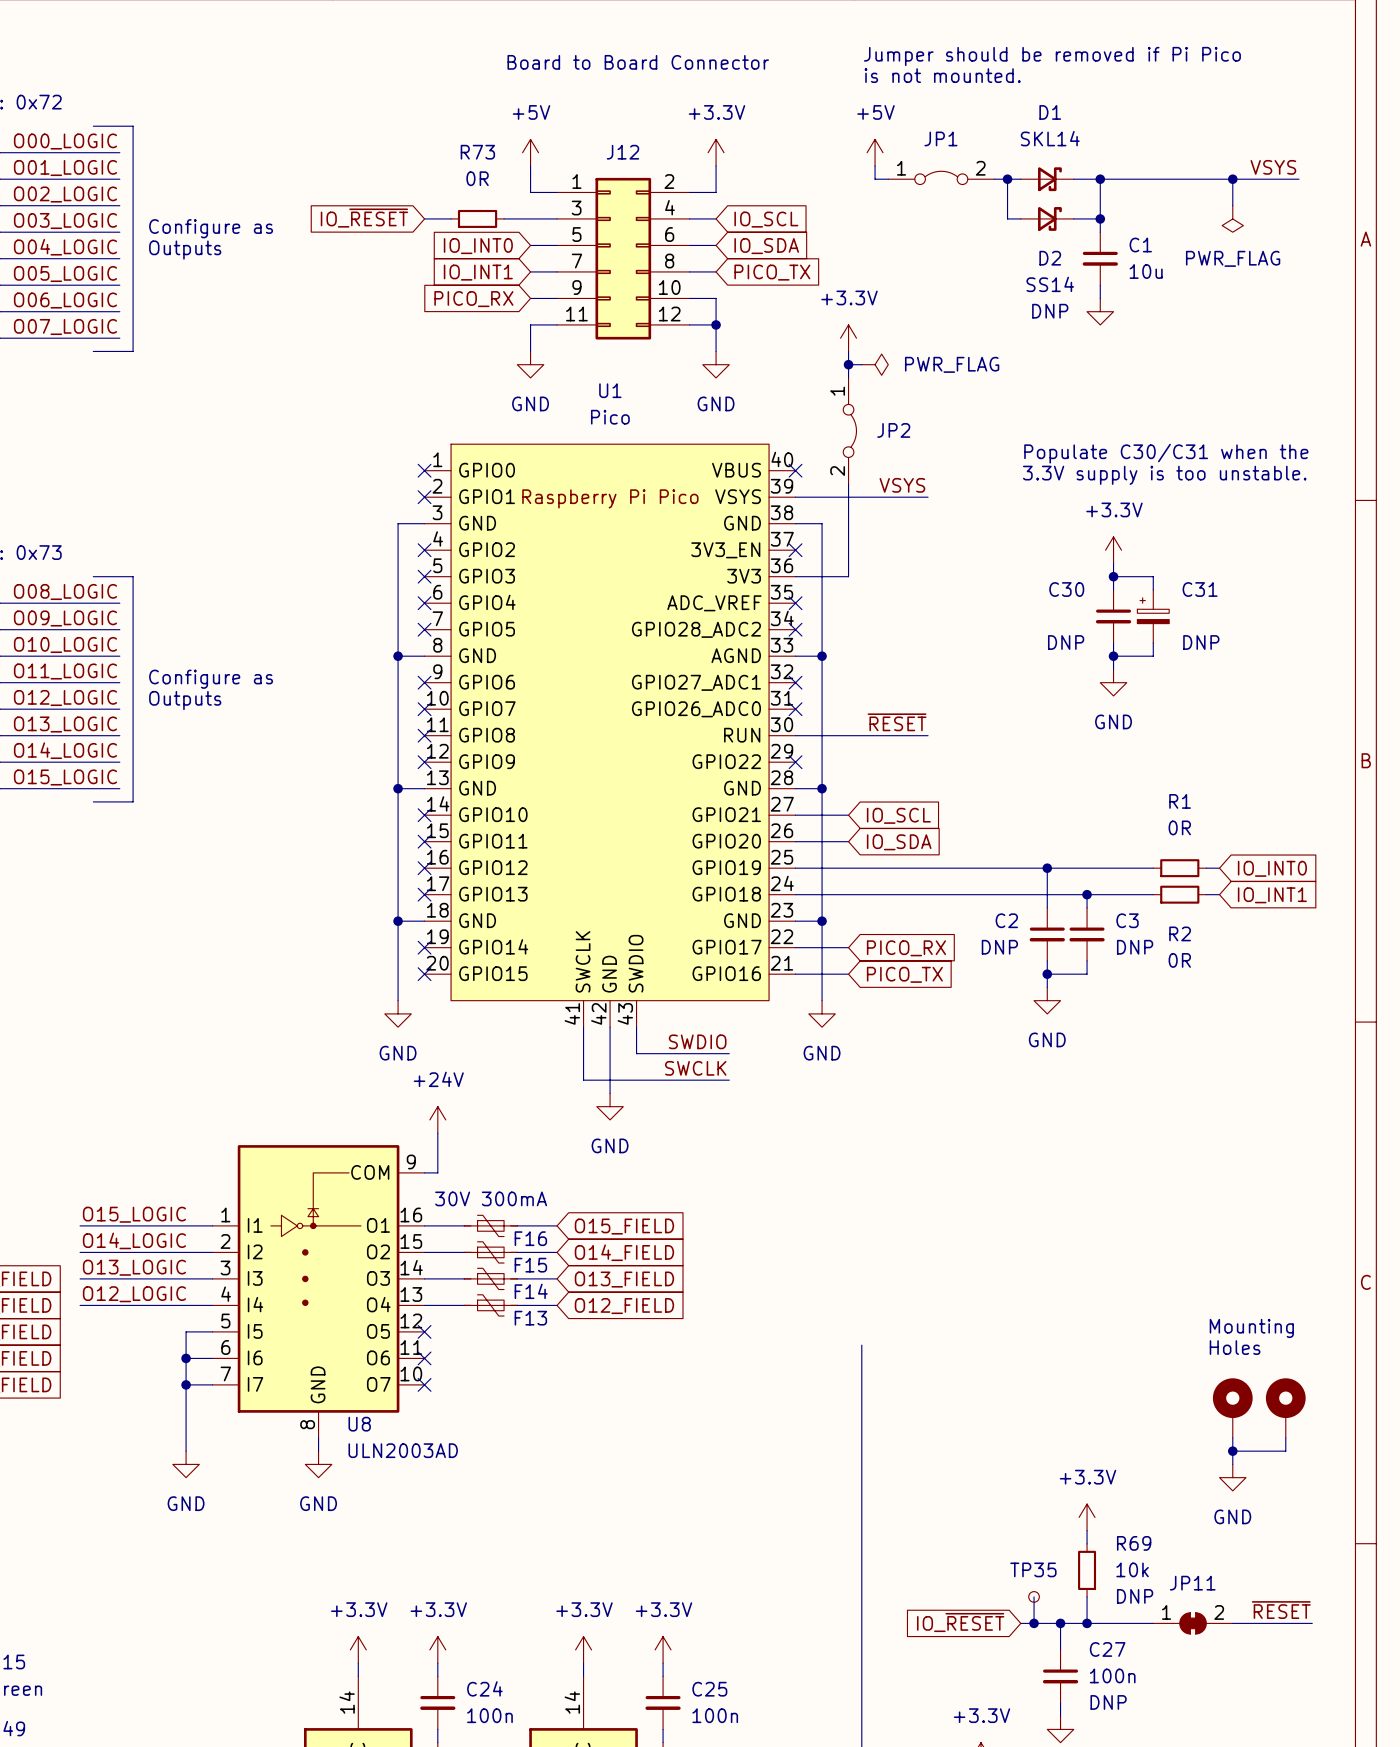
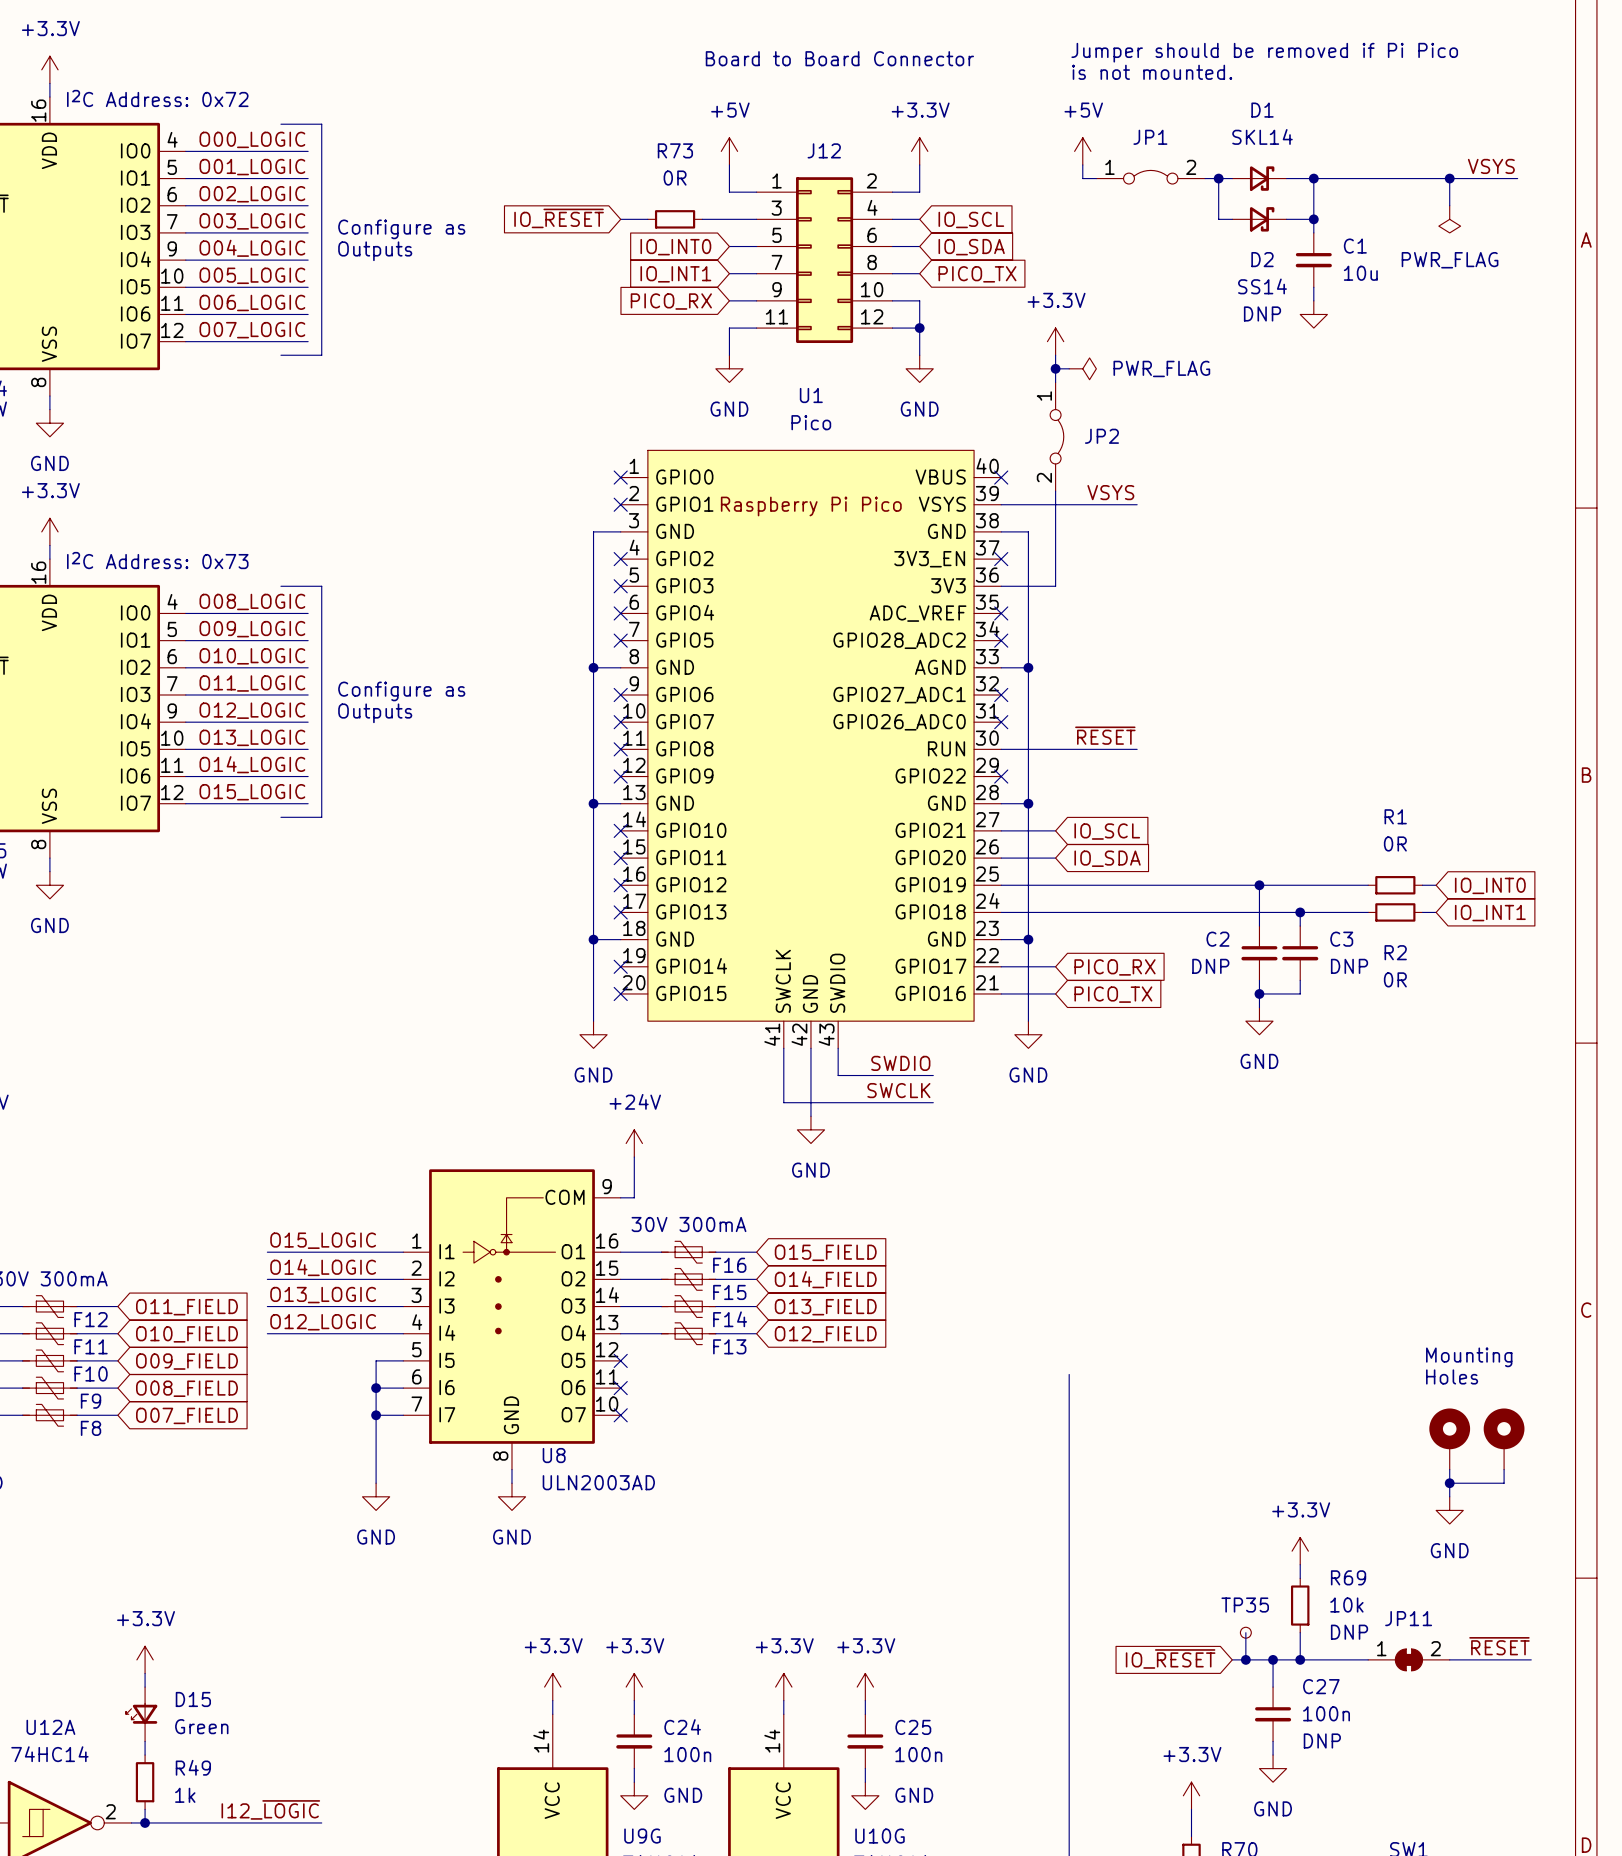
text: Populate C30/C31 when the (1166, 453) -> none
text: 3.3V supply is too unstable. (1164, 475) -> none
power symbol: +3.3V (1113, 550) -> none
wire: (1113, 563) (1113, 589) -> none
wire: (1113, 576) (1153, 576) (1153, 589) -> none
junction: (1113, 576) -> none
C30: (1113, 616) -> none
C31: (1153, 616) -> none
wire: (1113, 642) (1113, 669) -> none
wire: (1153, 642) (1153, 656) (1113, 656) -> none
junction: (1113, 656) -> none
power symbol: GND (1113, 682) -> none

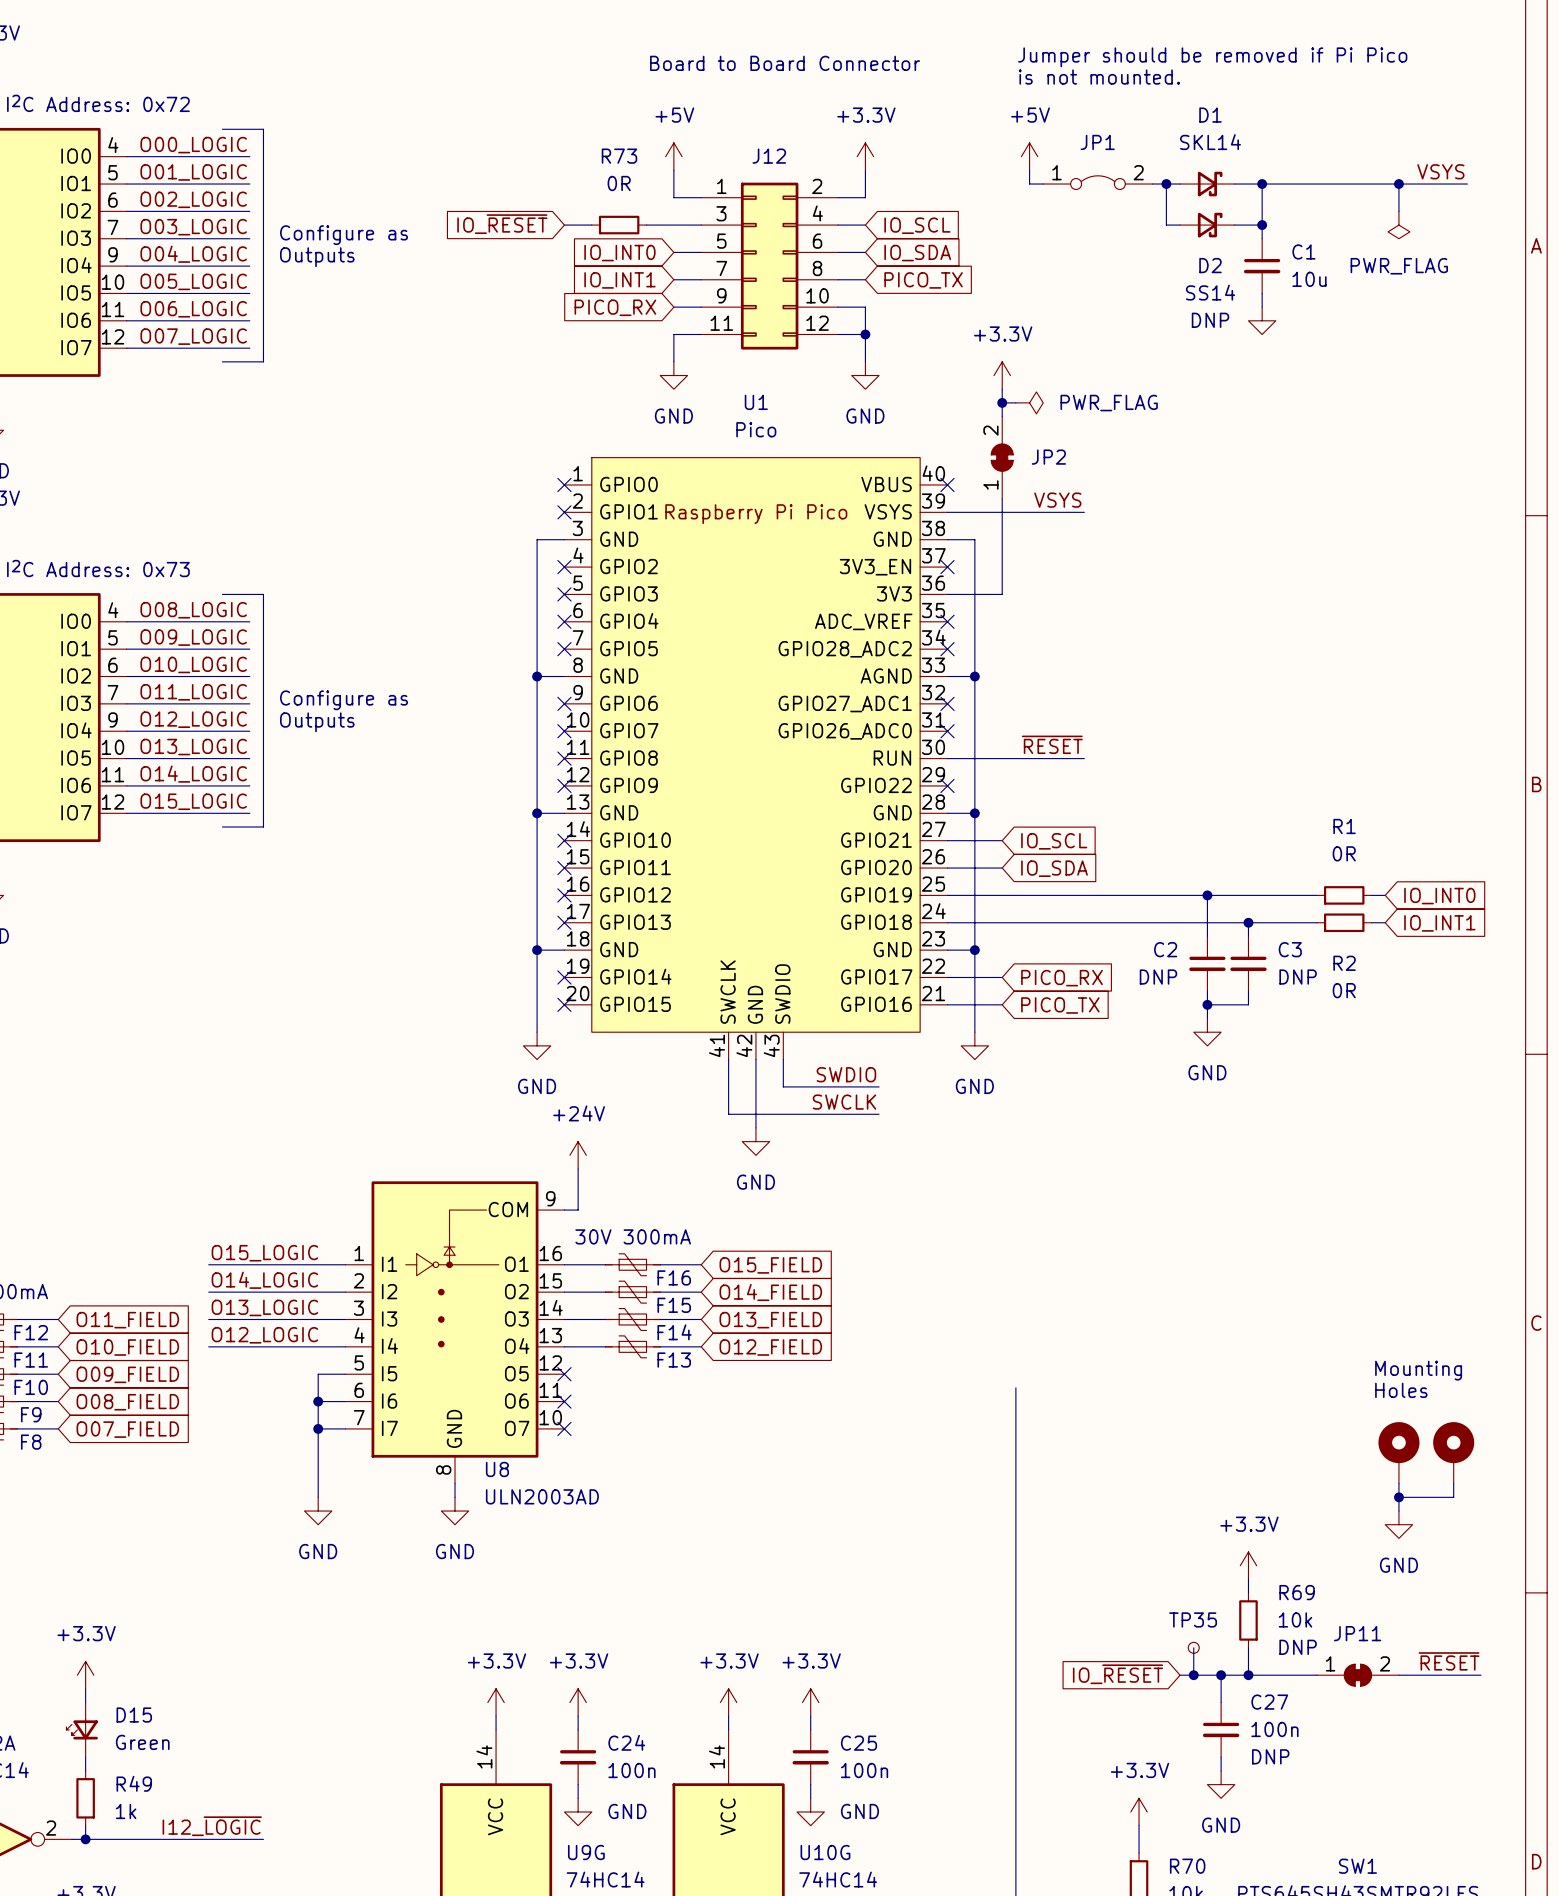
power symbol position: +3.3V (1055, 341) -> +3.3V (1002, 375)
wire: (1055, 368) (1069, 368) -> (1002, 402) (1015, 402)
junction position: (1055, 368) -> (1002, 402)
power symbol position: PWR_FLAG (1082, 368) -> PWR_FLAG (1029, 402)
JP2 symbol: [1050, 382, 1064, 492] -> [991, 416, 1014, 499]

